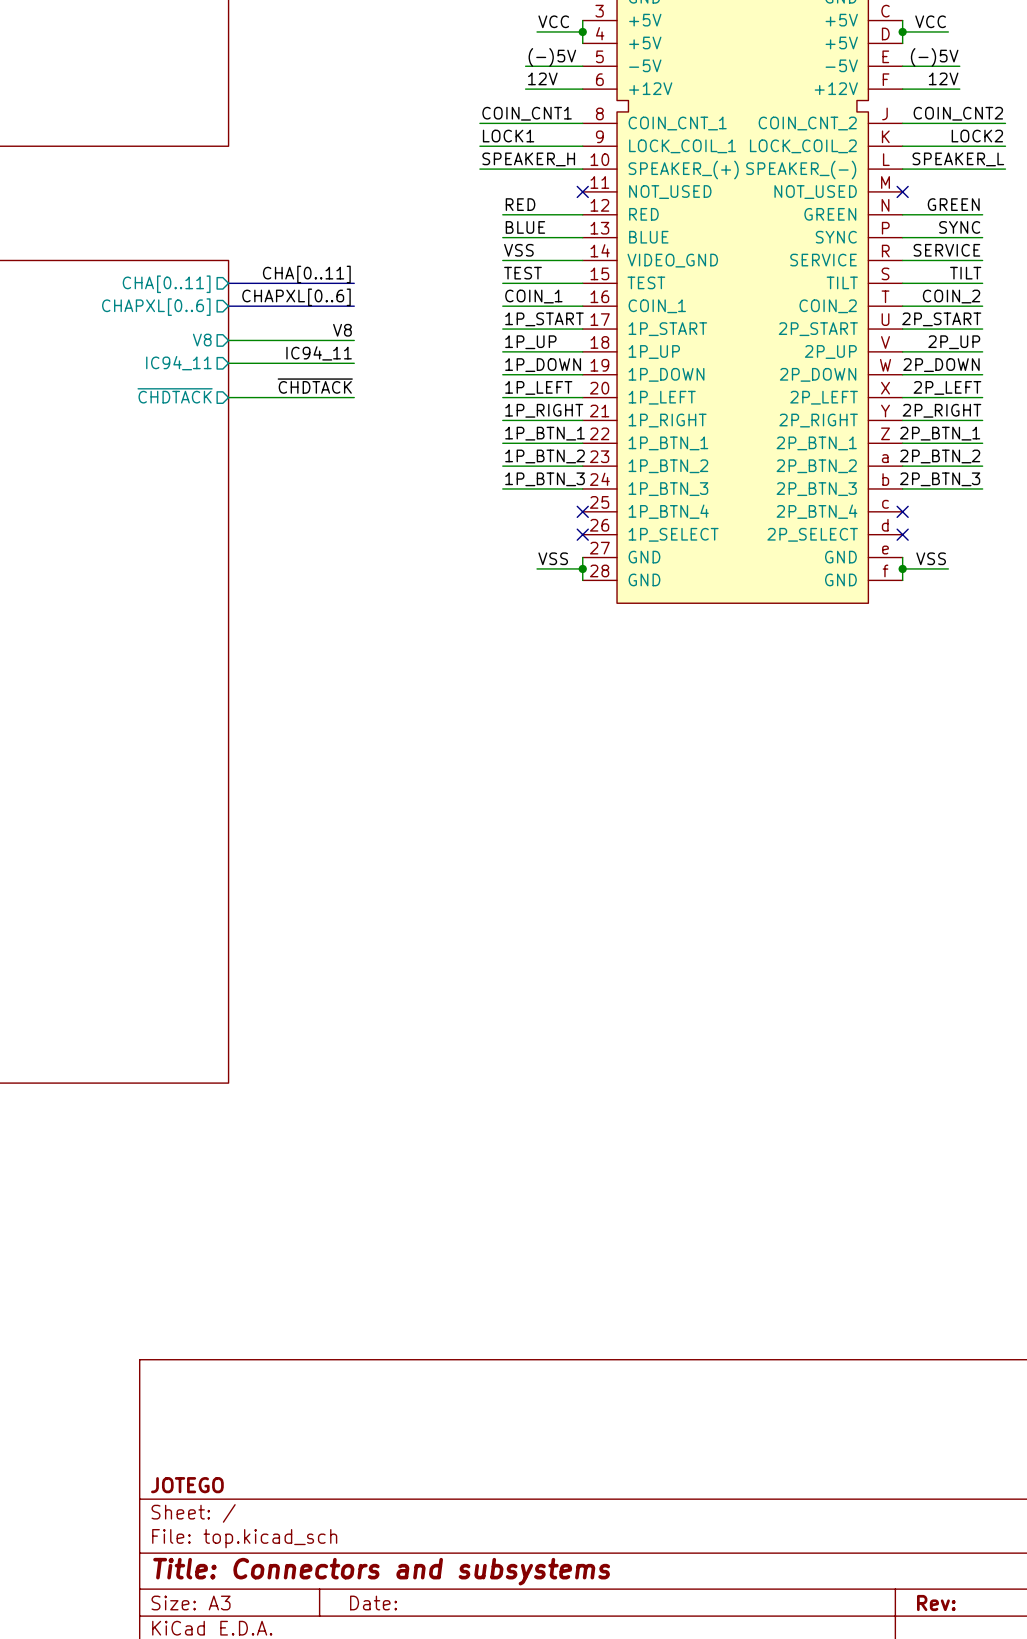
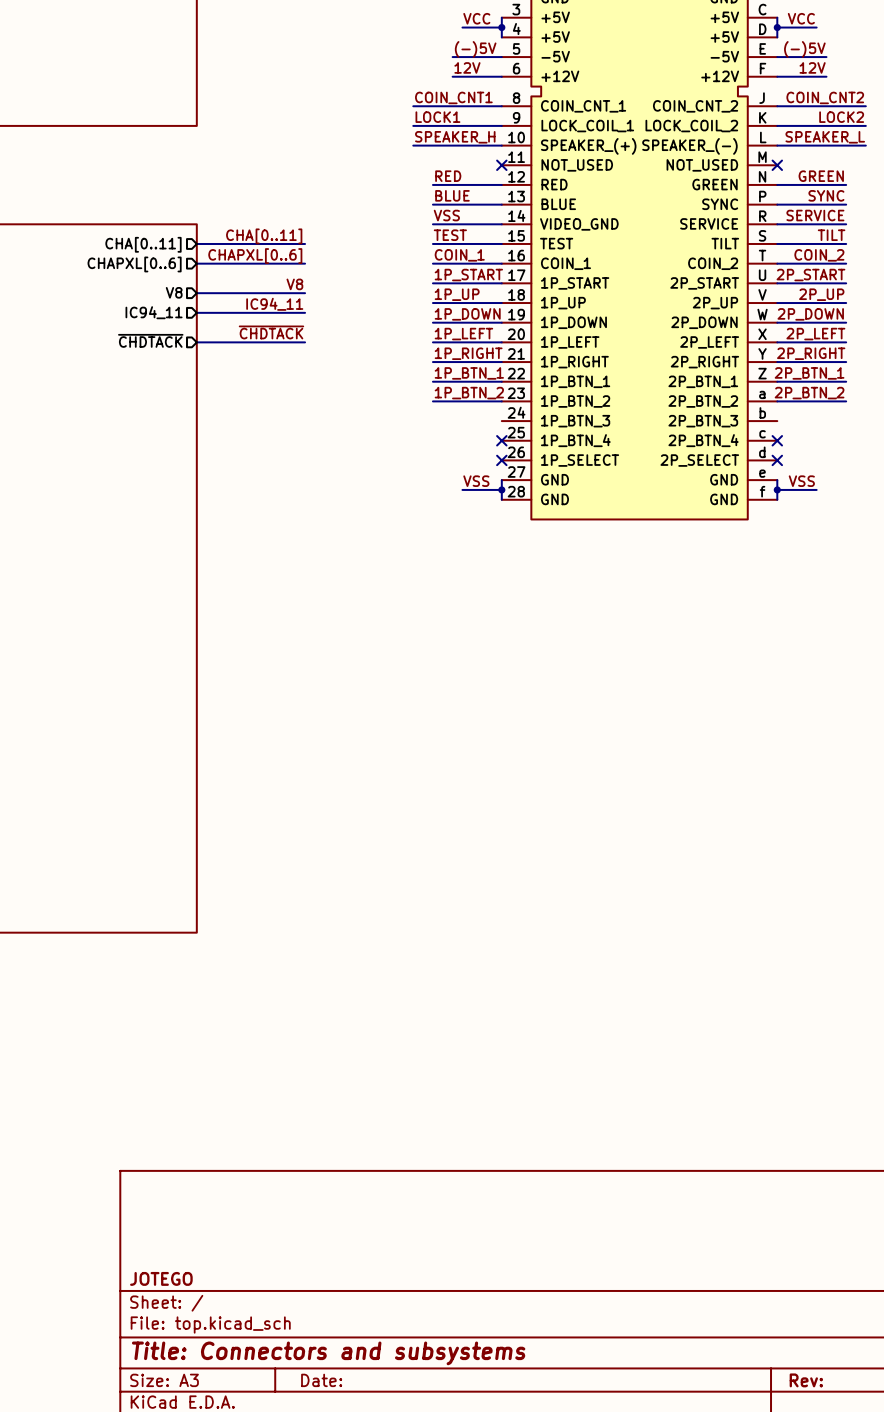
label: 1P_BTN_3 (545, 479) -> none
label: 2P_BTN_3 (940, 479) -> none
wire: (502, 488) (582, 488) -> none
wire: (902, 488) (982, 488) -> none

